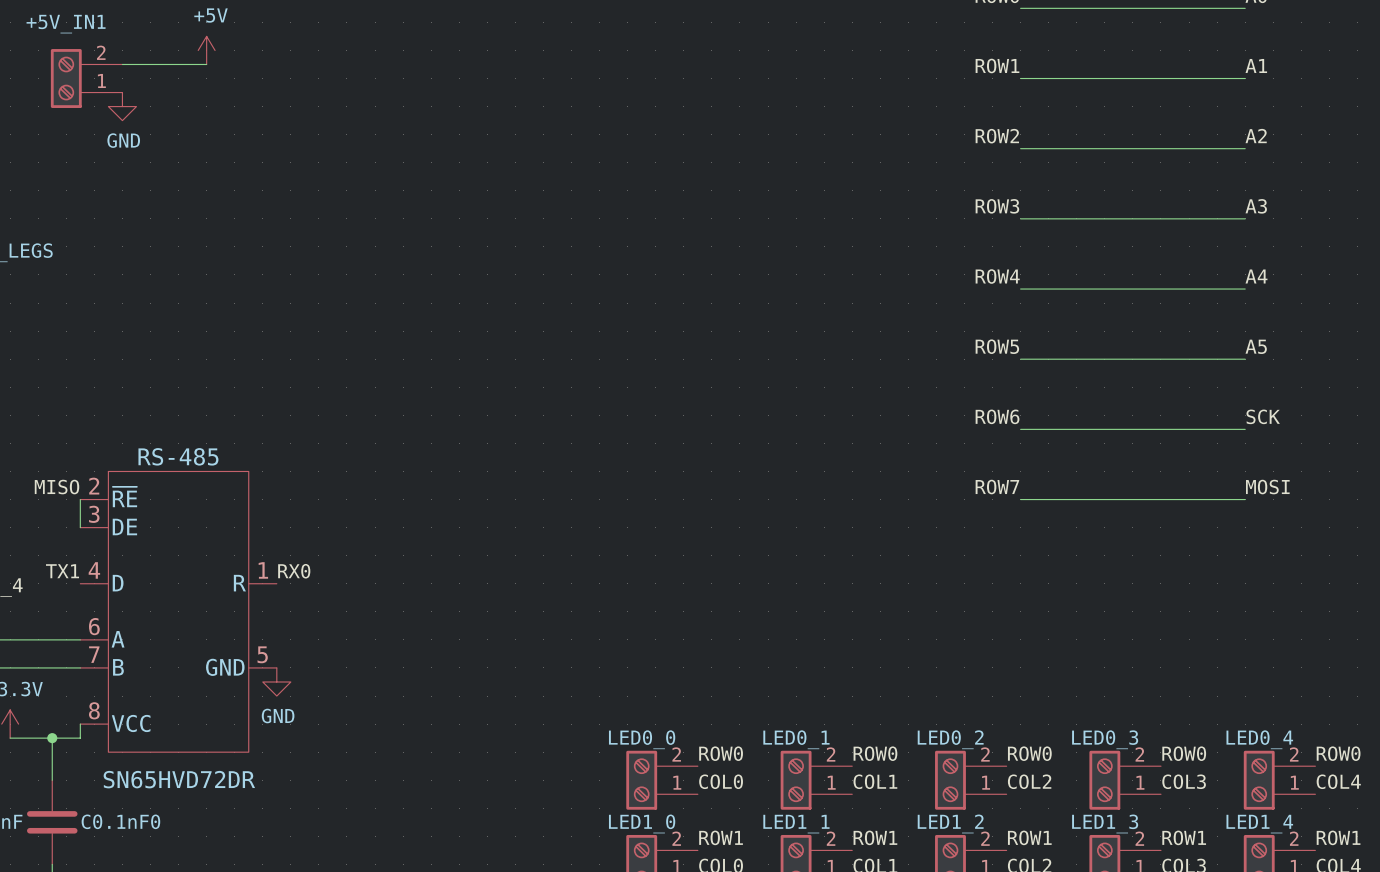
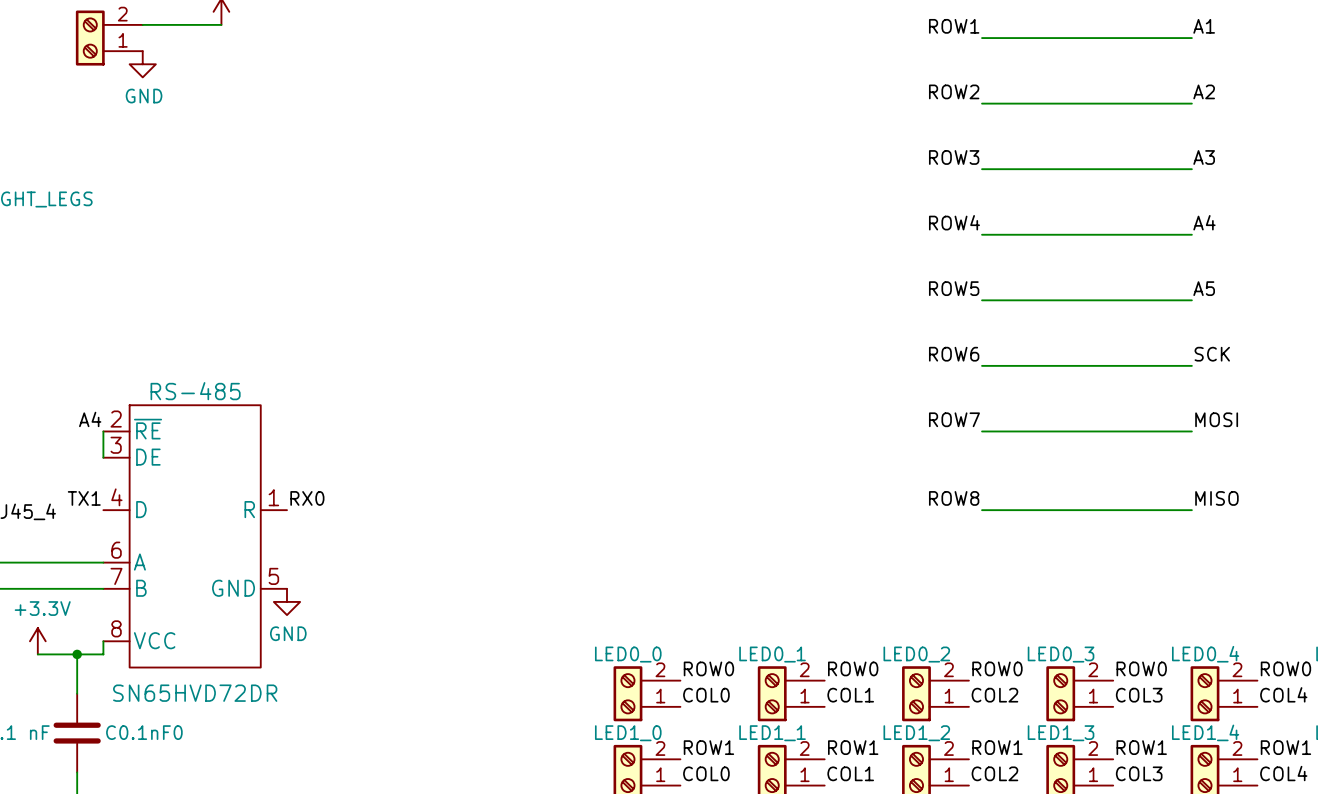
label: MISO (57, 487) -> A4 (90, 419)
label: none -> ROW8 (954, 498)
label: none -> MISO (1216, 498)
wire: none -> (982, 510) (1191, 510)

